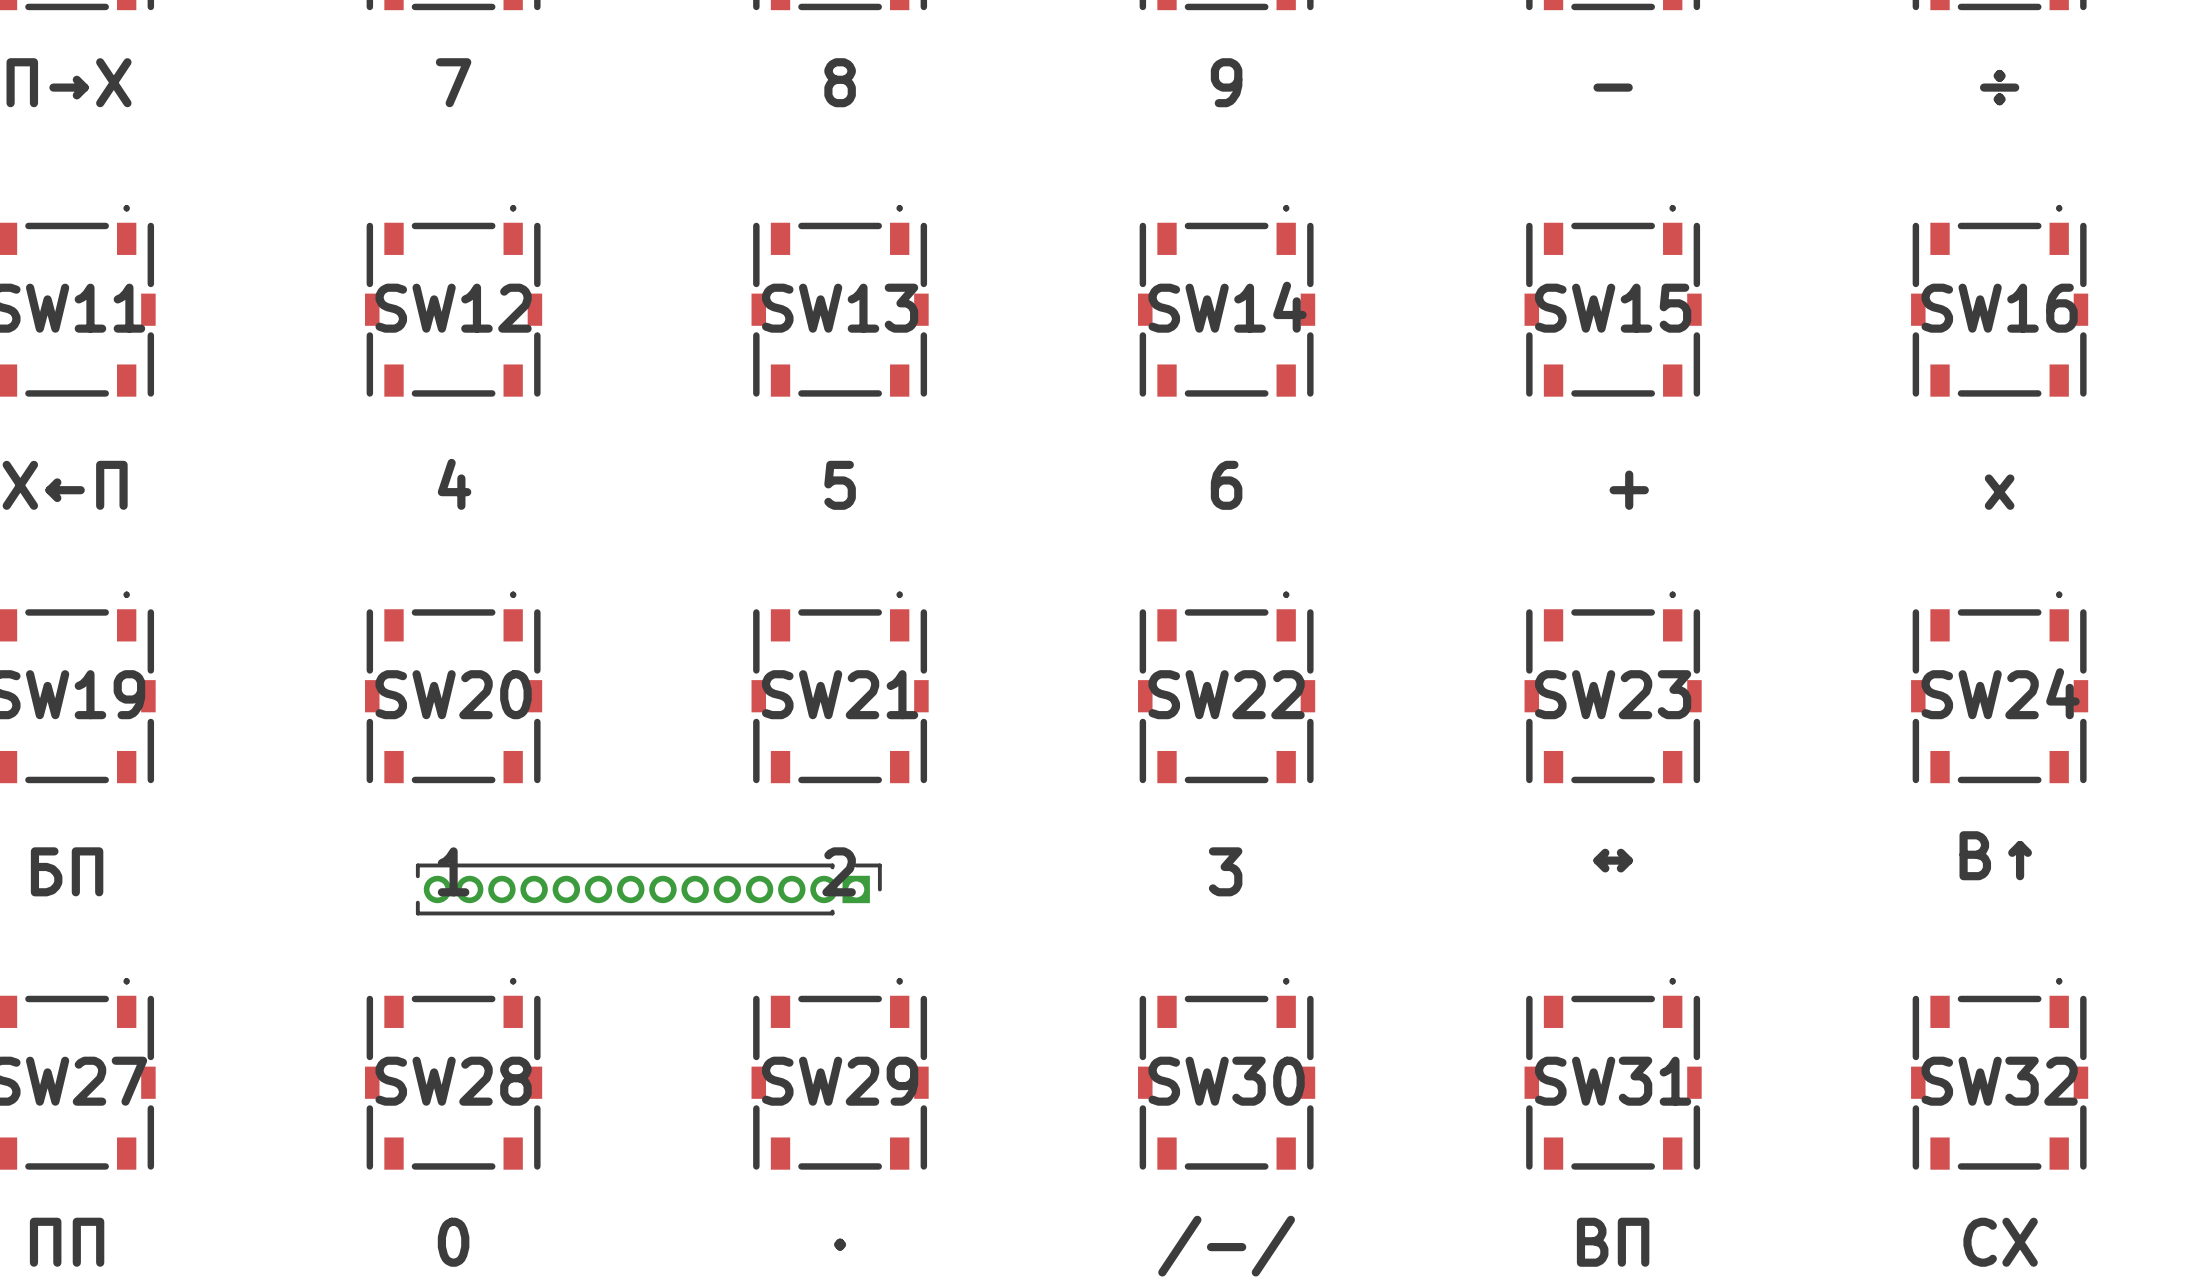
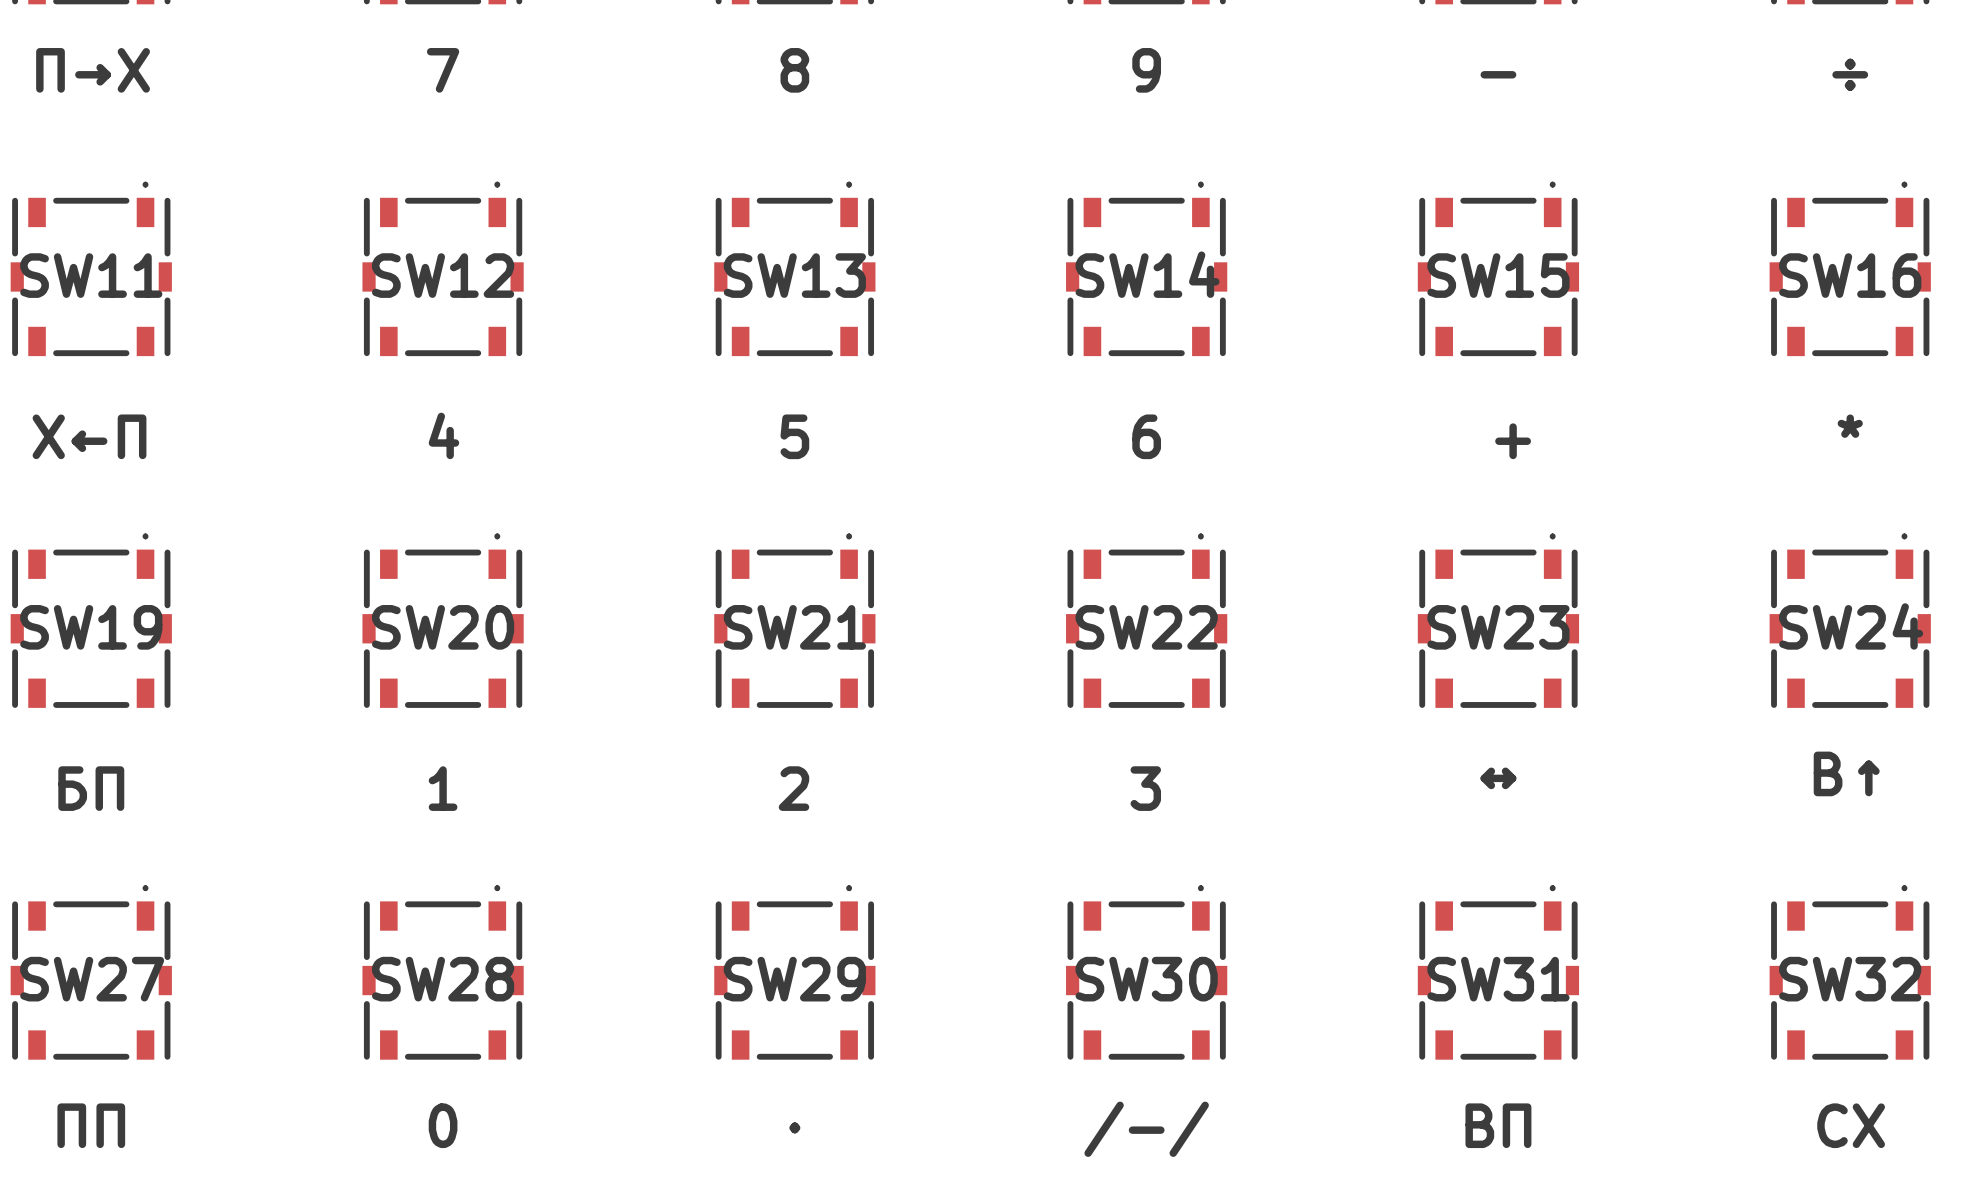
SW16 value: x (1999, 492) -> * (1850, 426)
part: (648, 889) -> none

